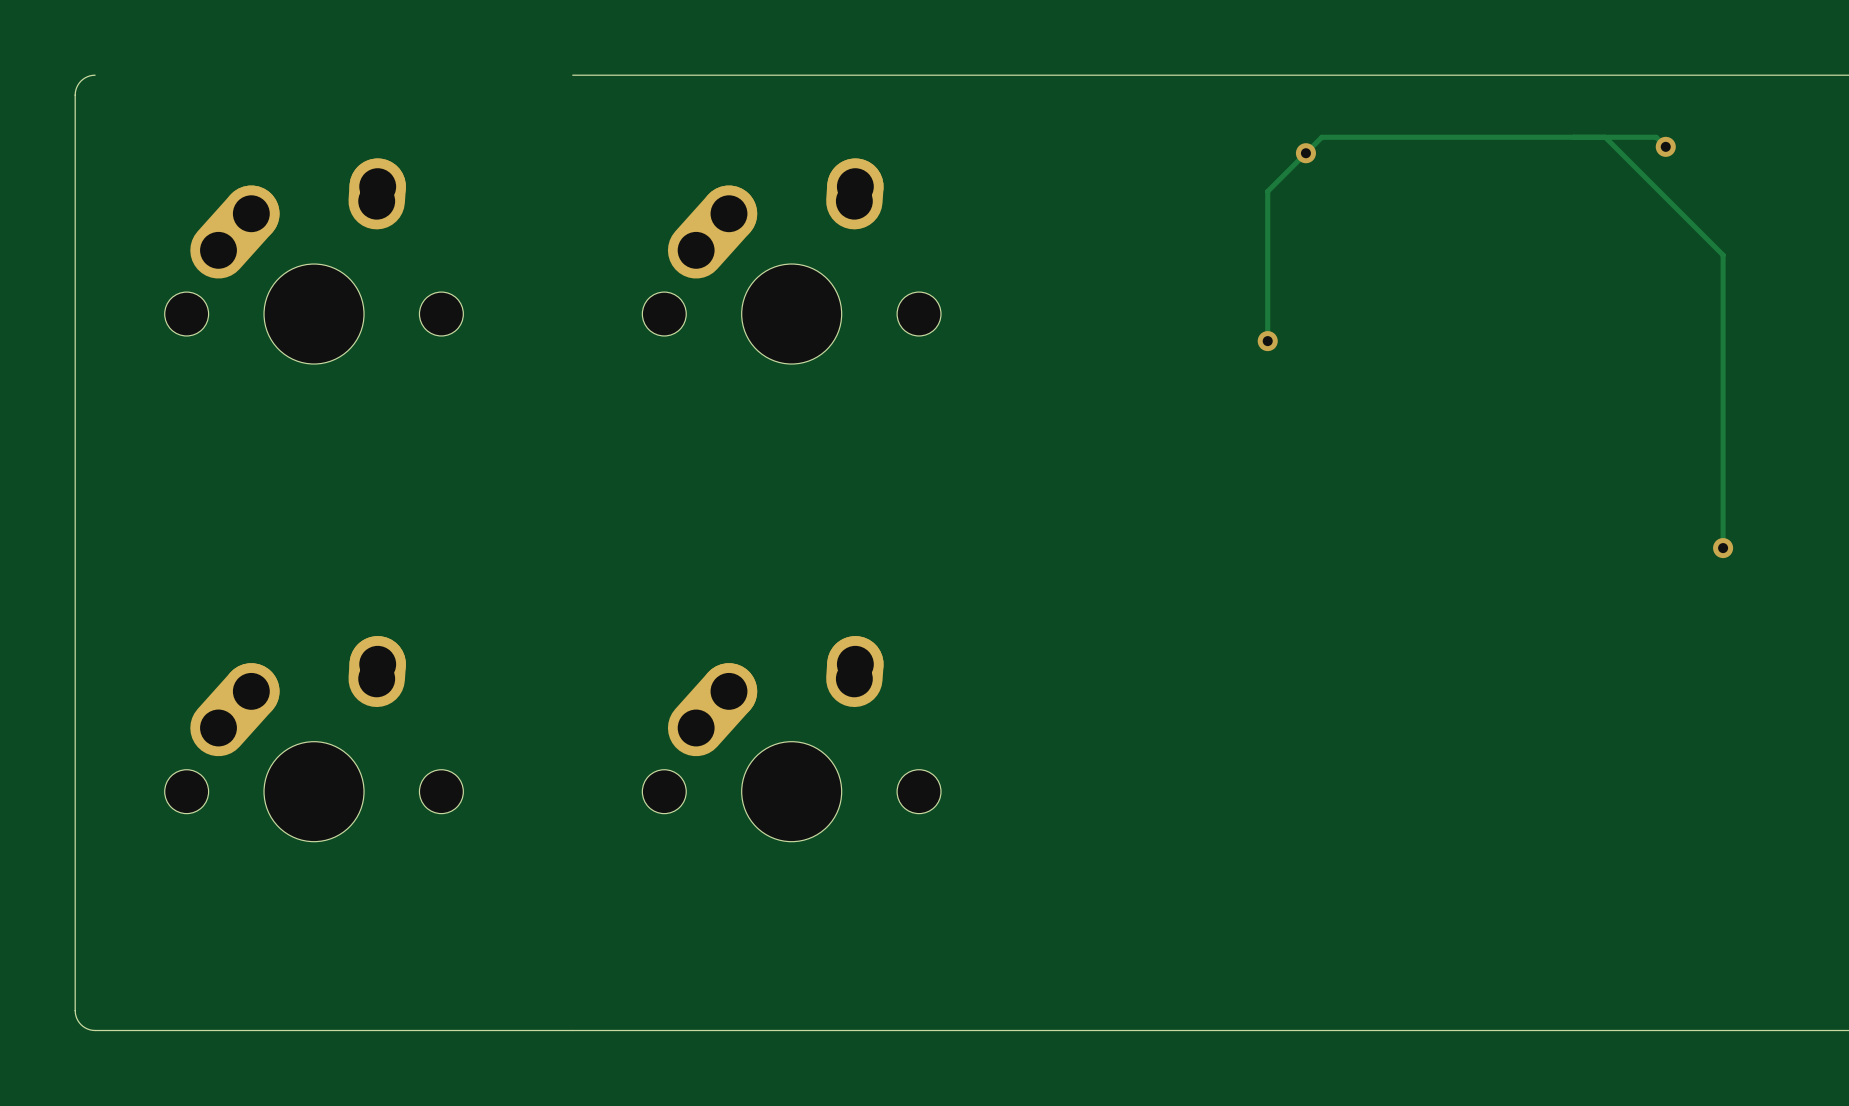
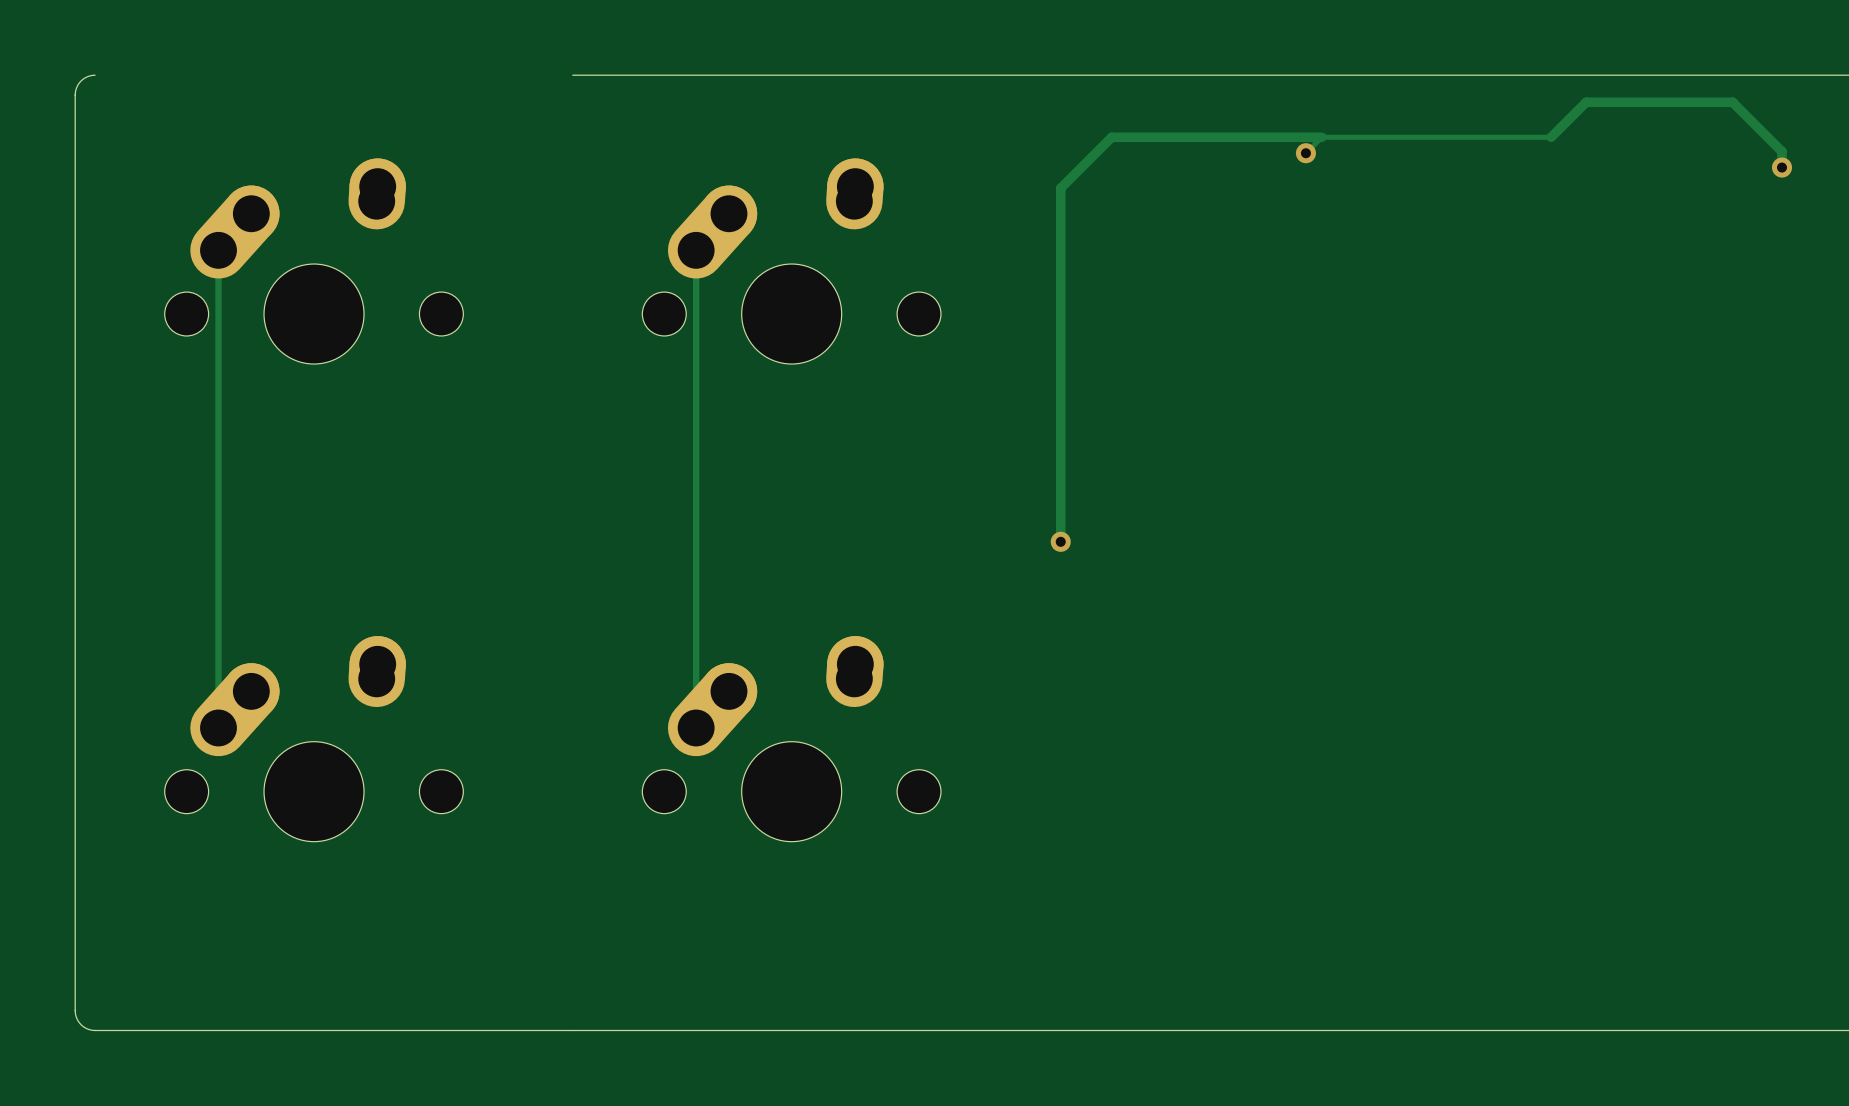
track: none -> (1321, 137) (1111, 137) (1060, 188) (1060, 541)
track: (1551, 137) (1656, 137) (1665, 146) -> (1551, 137) (1586, 102) (1732, 102) (1782, 151) (1782, 167)
track: (1605, 137) (1723, 255) (1723, 548) -> none
via position: (1665, 146) -> (1782, 167)
track: (1305, 153) (1267, 191) (1267, 341) -> none
track: none -> (218, 250) (218, 727)
track: none -> (696, 250) (696, 727)
via: (1267, 341) -> none
via: none -> (1060, 541)
via: (1723, 548) -> none

